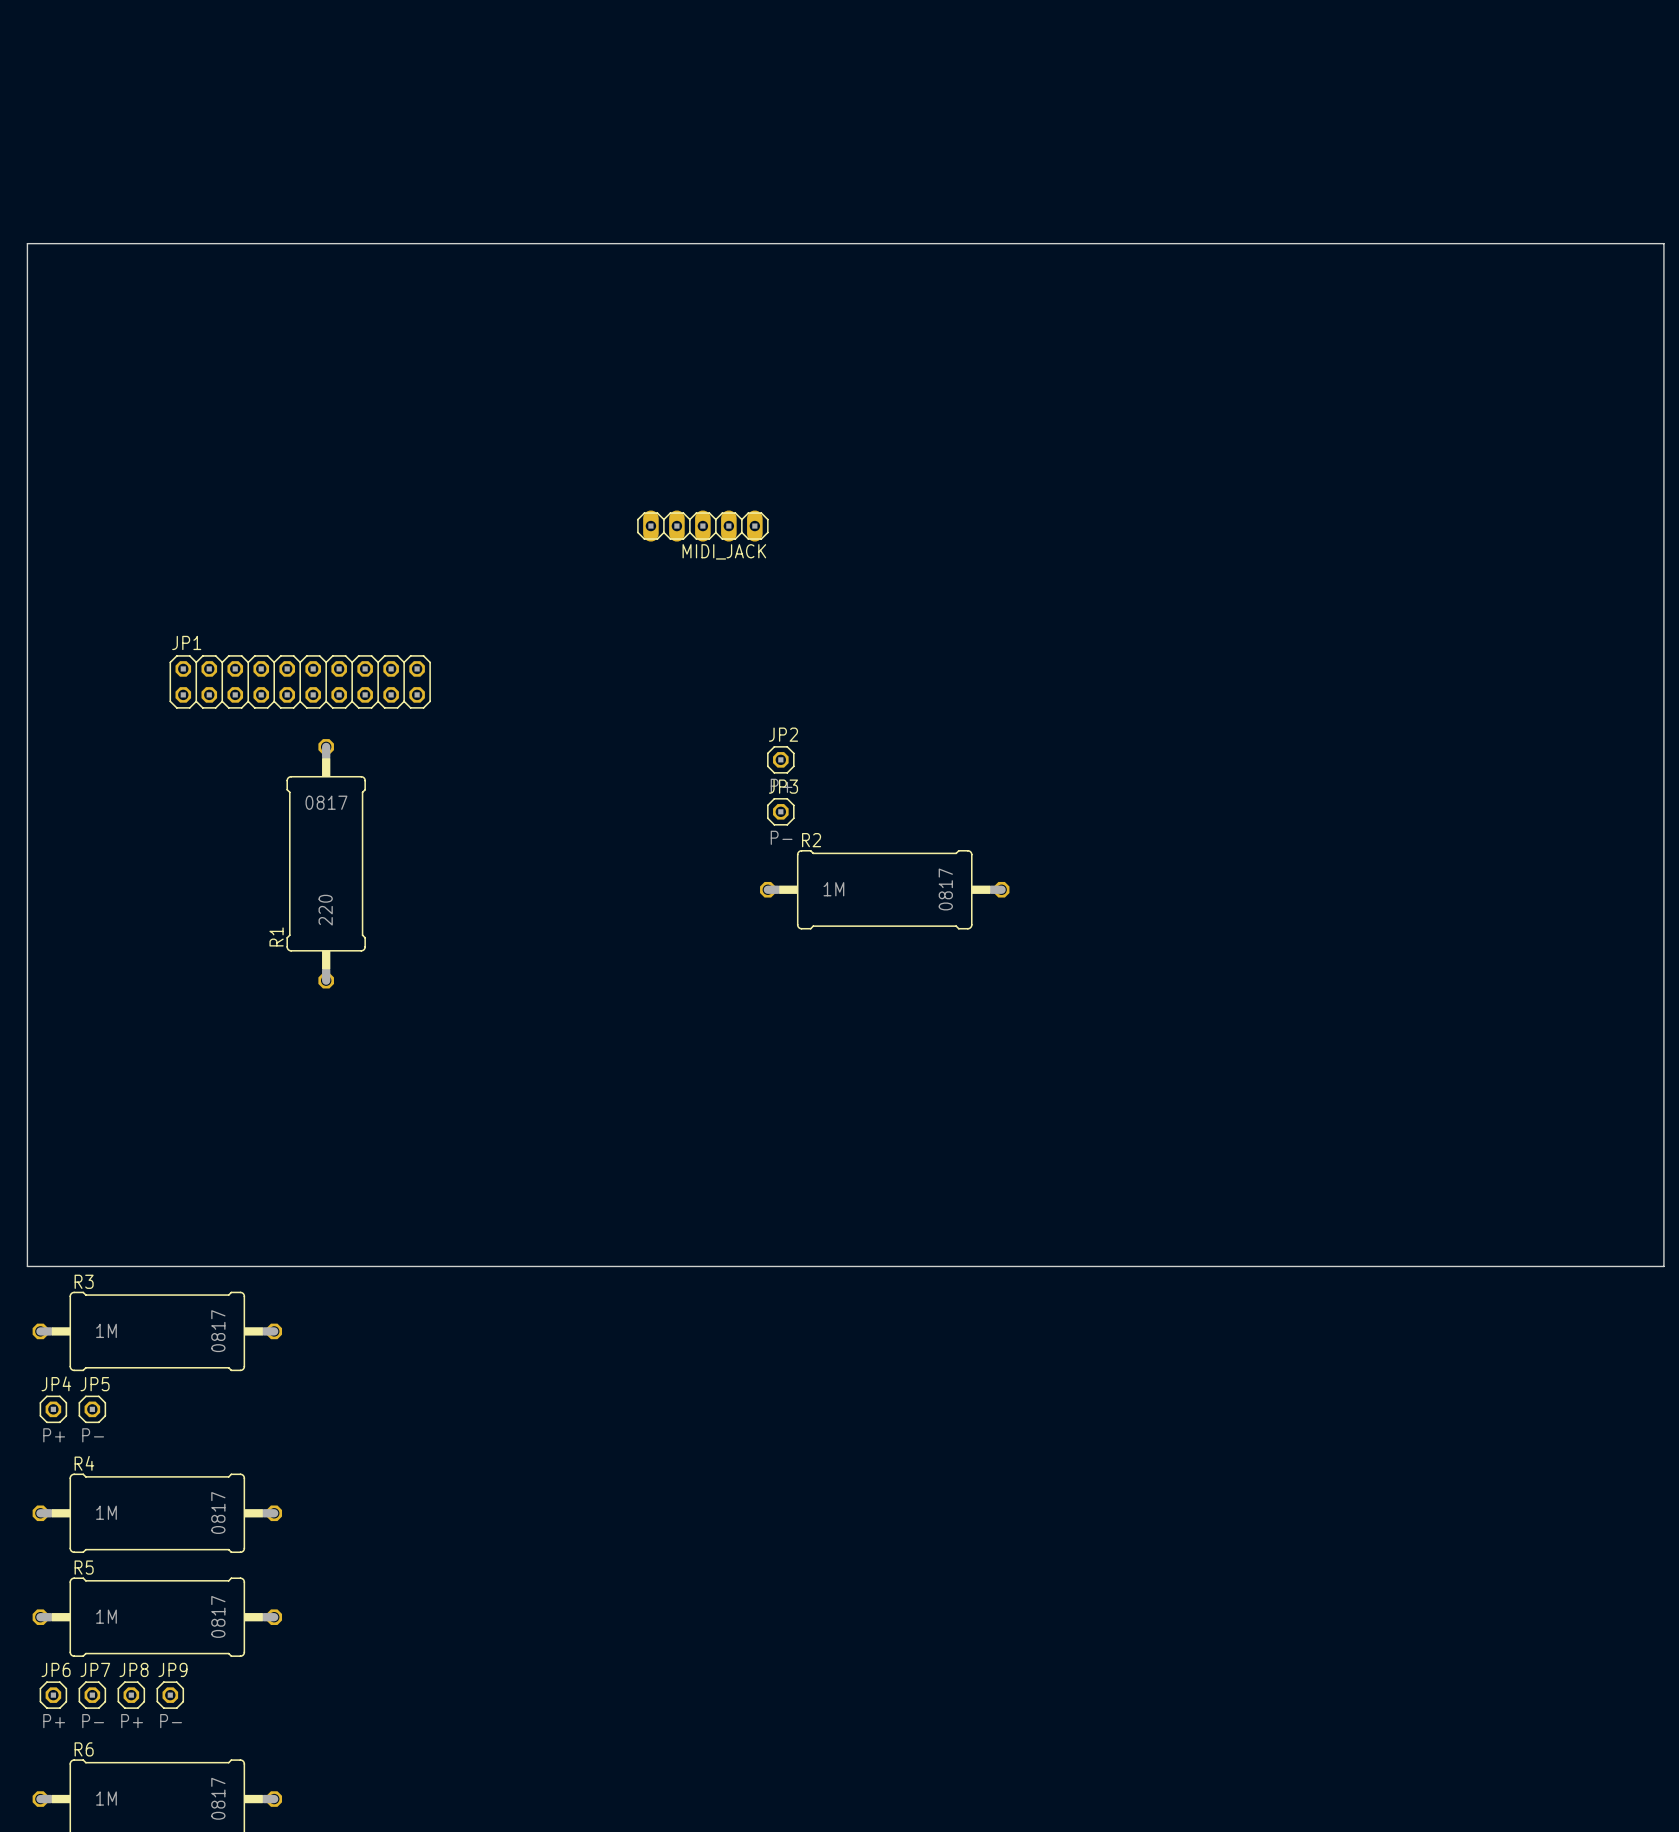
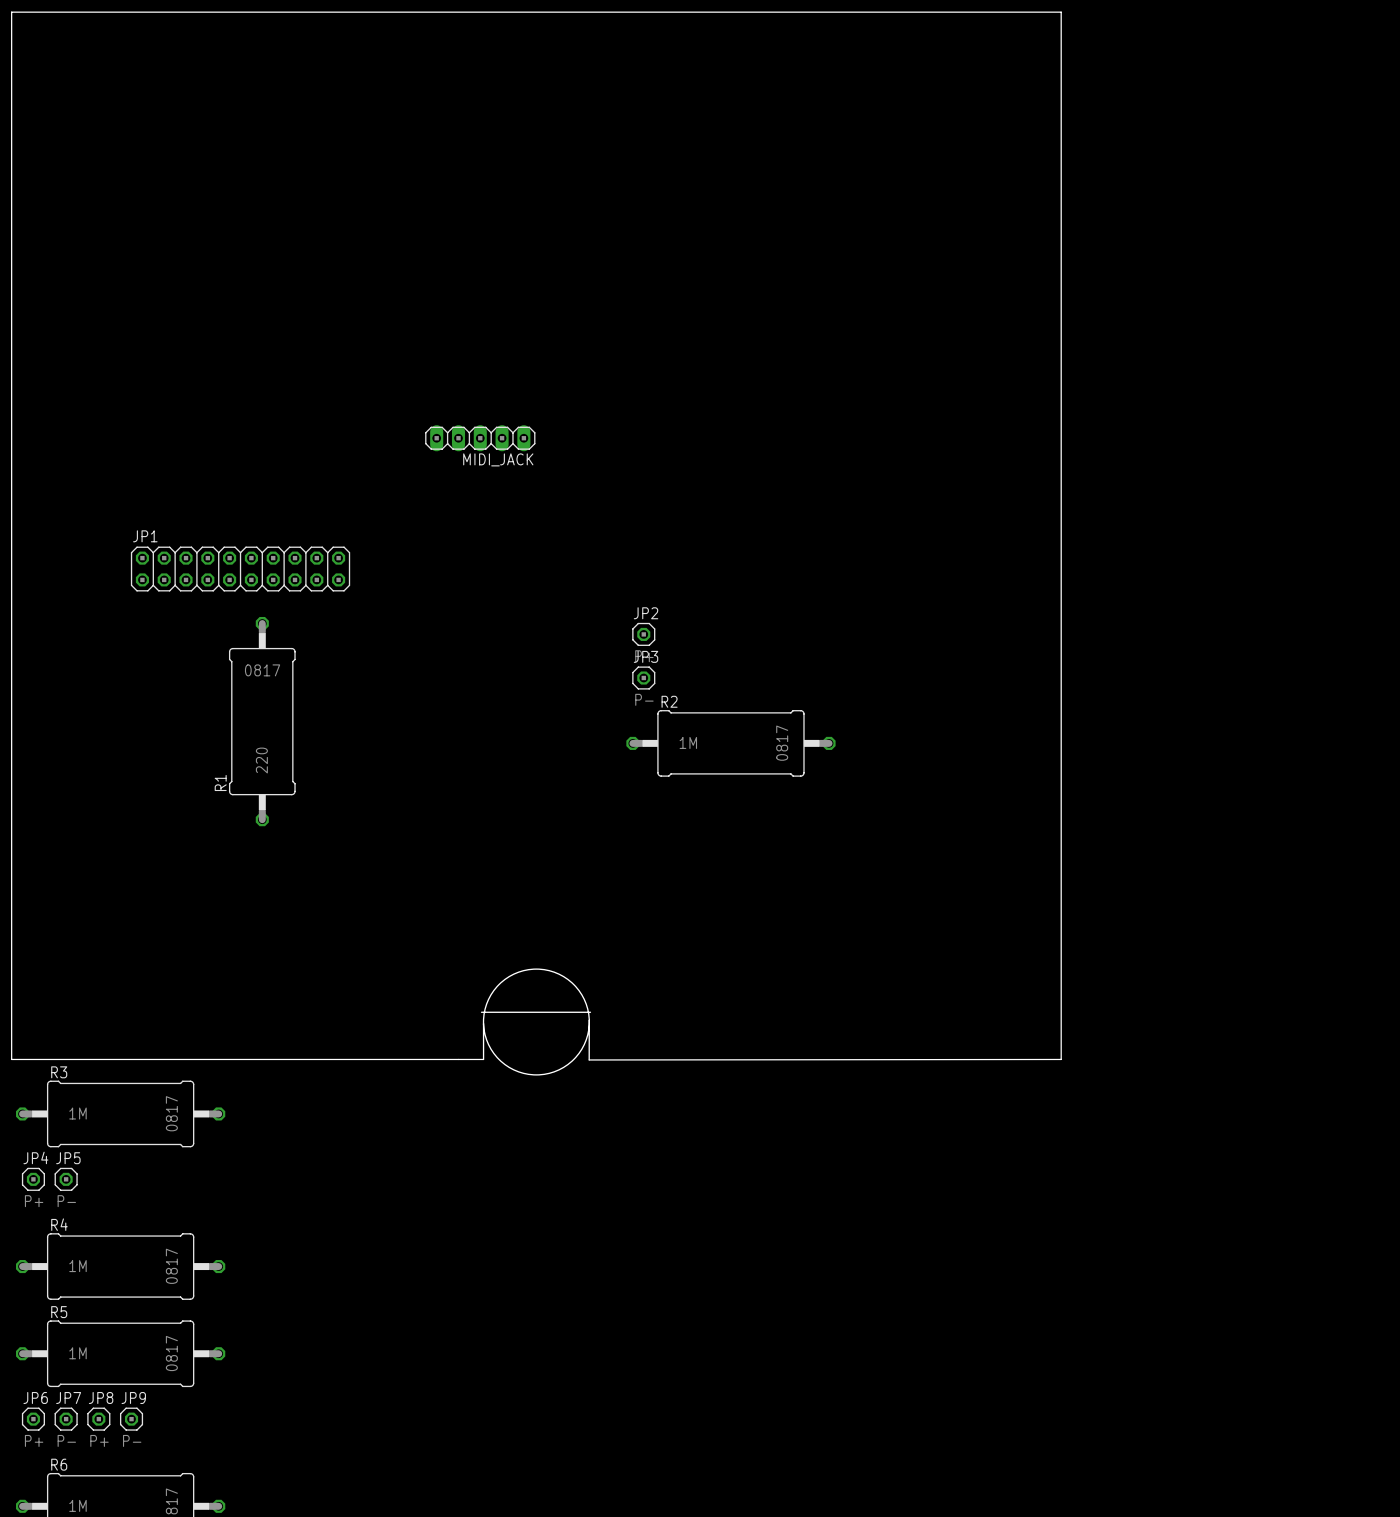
board edge: (27, 243) (1663, 243) (1663, 1266) (589, 1266) -> (11, 201) (11, 12) (1061, 12) (1061, 1059) (589, 1059) (589, 1020)
MIDI_JACK position: (702, 526) -> (480, 438)
round board edge: none -> [482, 968, 590, 1076]
board edge: none -> (481, 1012) (590, 1012)
board edge: none -> (483, 1023) (483, 1059)

